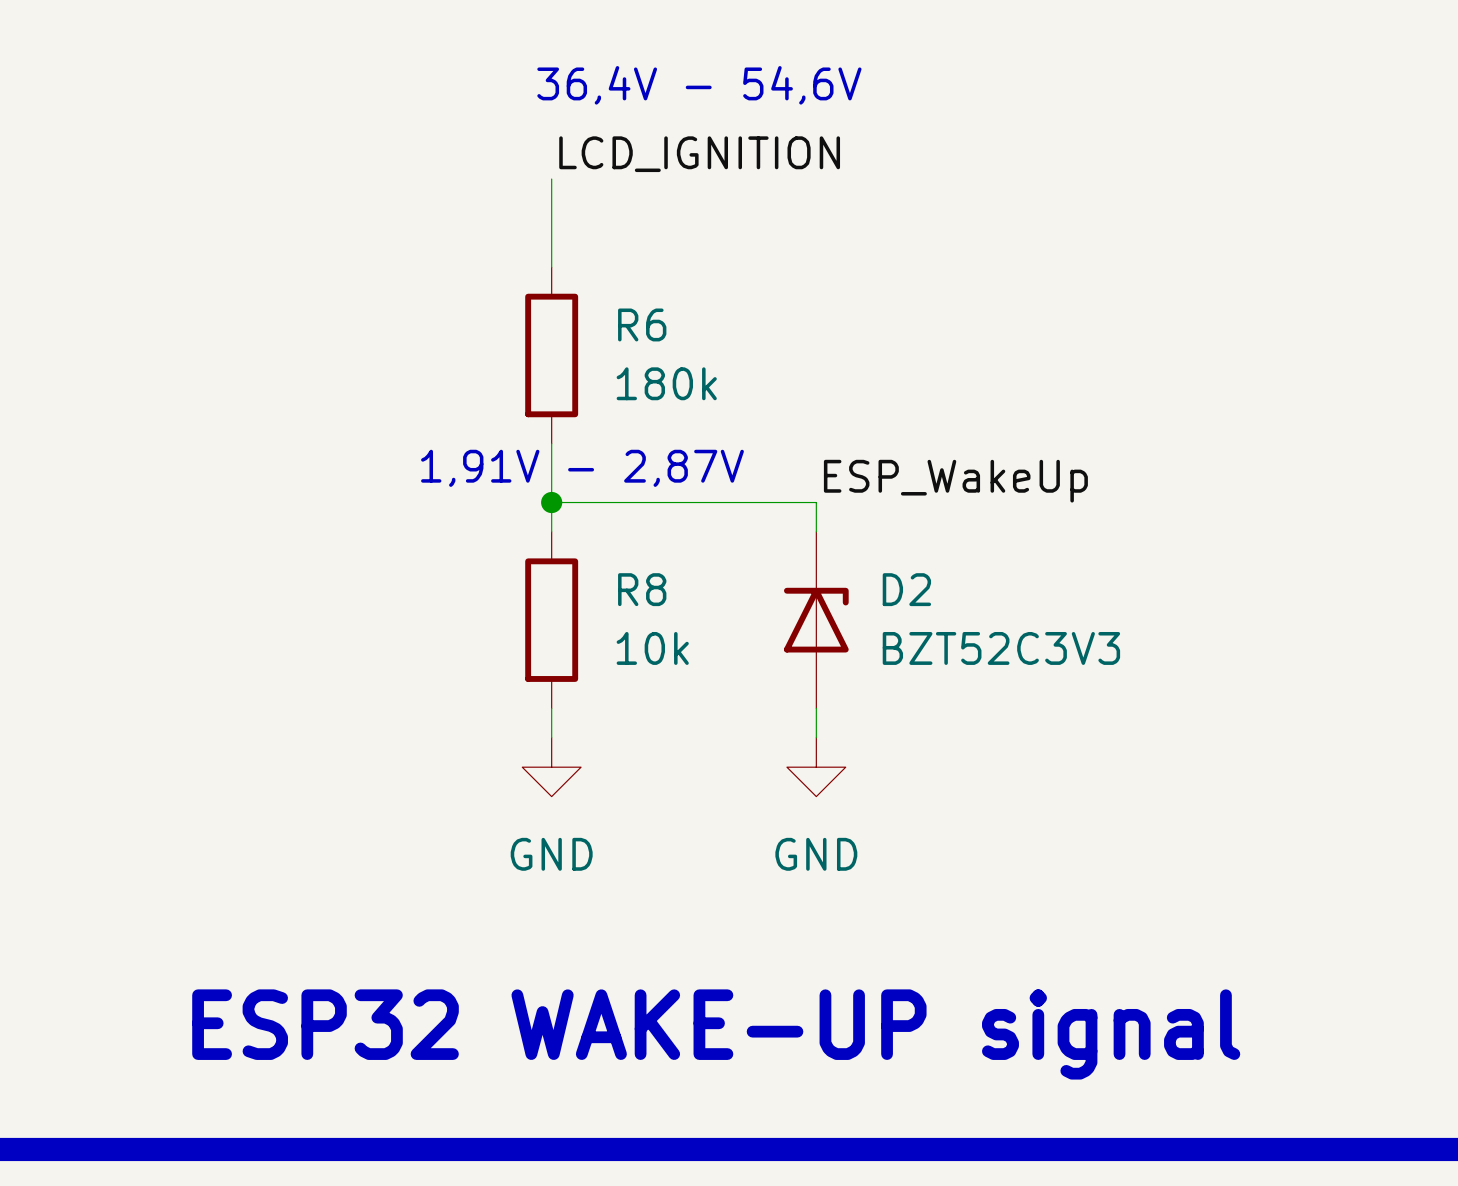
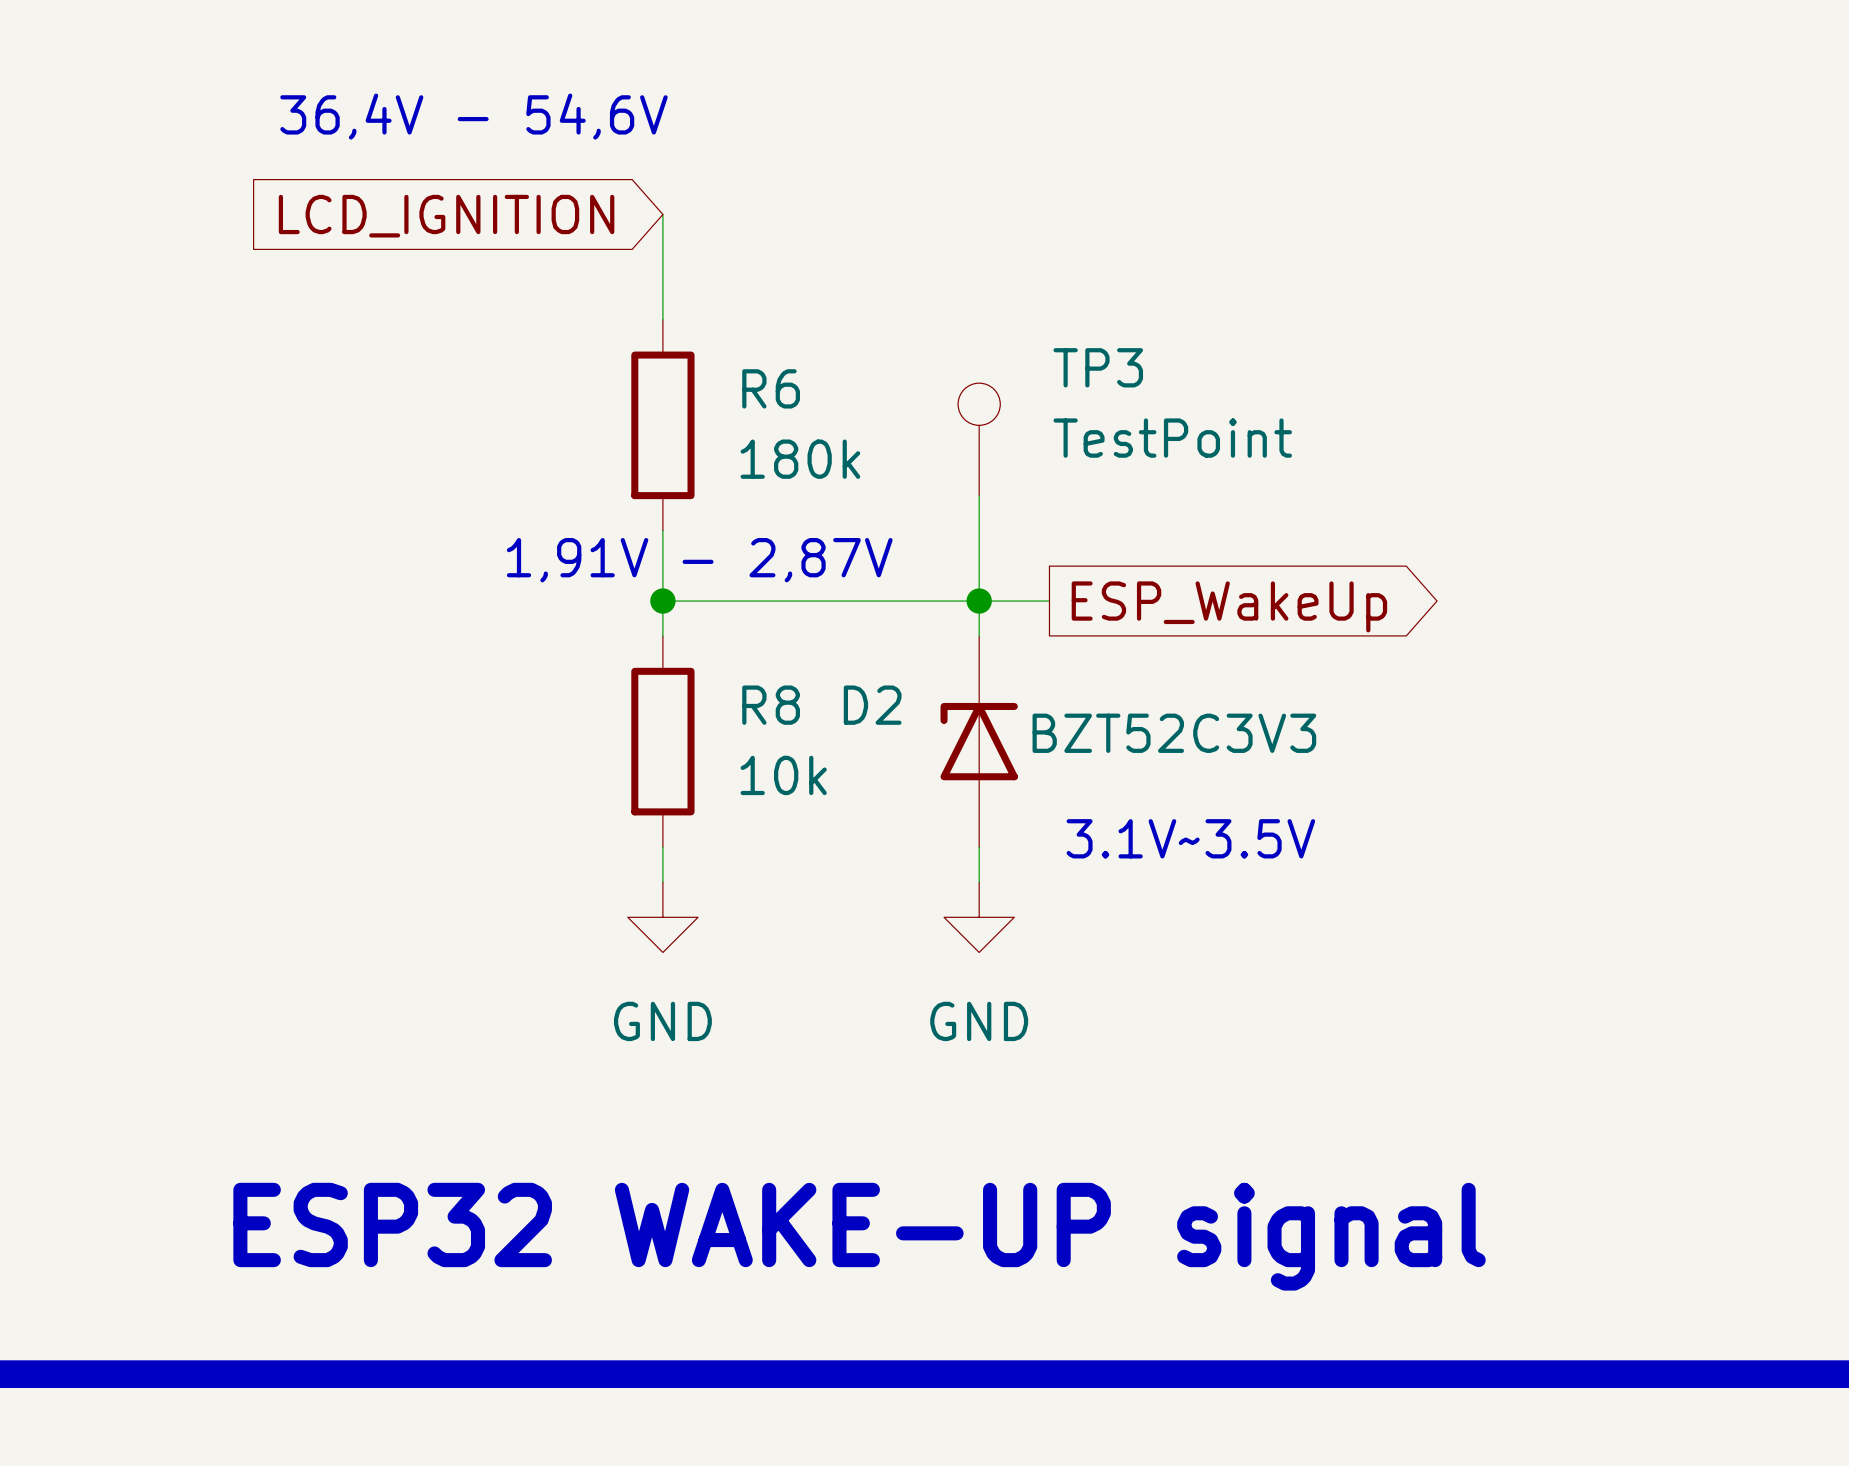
text position: 36,4V - 54,6V (699, 85) -> 36,4V - 54,6V (473, 116)
label: LCD_IGNITION (699, 154) -> none
global label: none -> LCD_IGNITION (446, 216)
TP3: none -> TestPoint (979, 439)
wire: none -> (979, 495) (979, 601) (1049, 601)
label: ESP_WakeUp (955, 481) -> none
junction: none -> (979, 601)
global label: none -> ESP_WakeUp (1229, 606)
D2 flip: as is (816, 620) -> left-right (979, 741)
D2 value position: BZT52C3V3 (1001, 648) -> BZT52C3V3 (1174, 733)
text: none -> 3.1V~3.5V (1190, 838)

